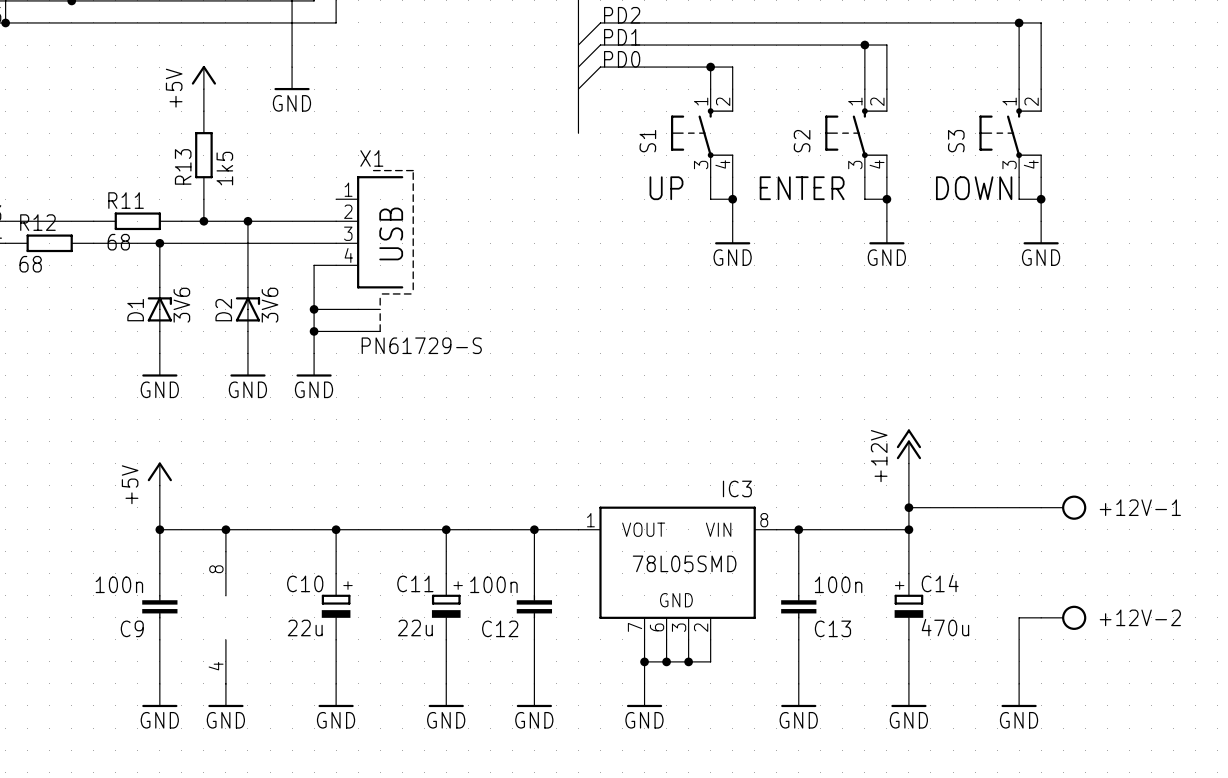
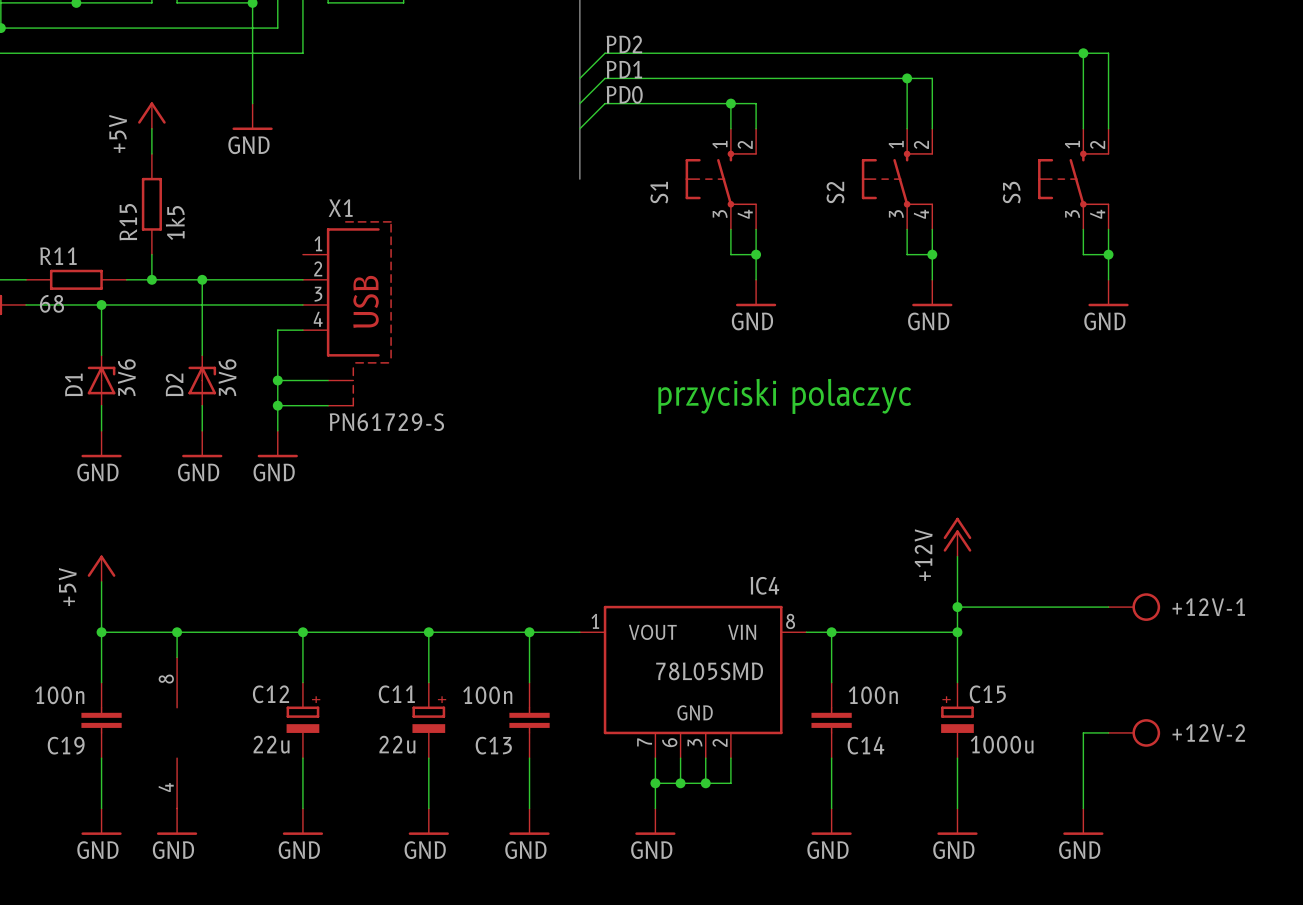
R13 name: R13 (183, 166) -> R15 (128, 222)
text: UP (666, 188) -> none
text: ENTER (802, 188) -> none
text: DOWN (974, 188) -> none
text: none -> przyciski polaczyc (784, 396)
IC3 name: IC3 (737, 488) -> IC4 (764, 585)
C10 name: C10 (305, 583) -> C12 (270, 694)
C14 name: C14 (940, 583) -> C15 (987, 694)
C14 value: 470u (945, 627) -> 1000u (1002, 744)
C9 name: C9 (132, 628) -> C19 (66, 745)
C12 name: C12 (500, 628) -> C13 (493, 745)
C13 name: C13 (832, 628) -> C14 (865, 745)

